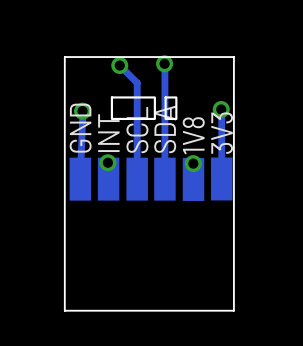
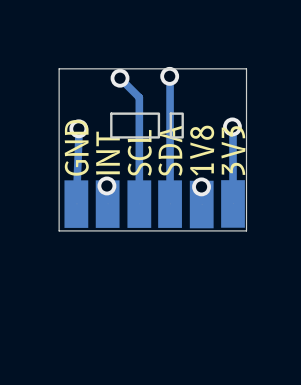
board edge: (233, 203) (233, 310) (64, 310) (64, 203) -> (246, 230) (59, 230)

